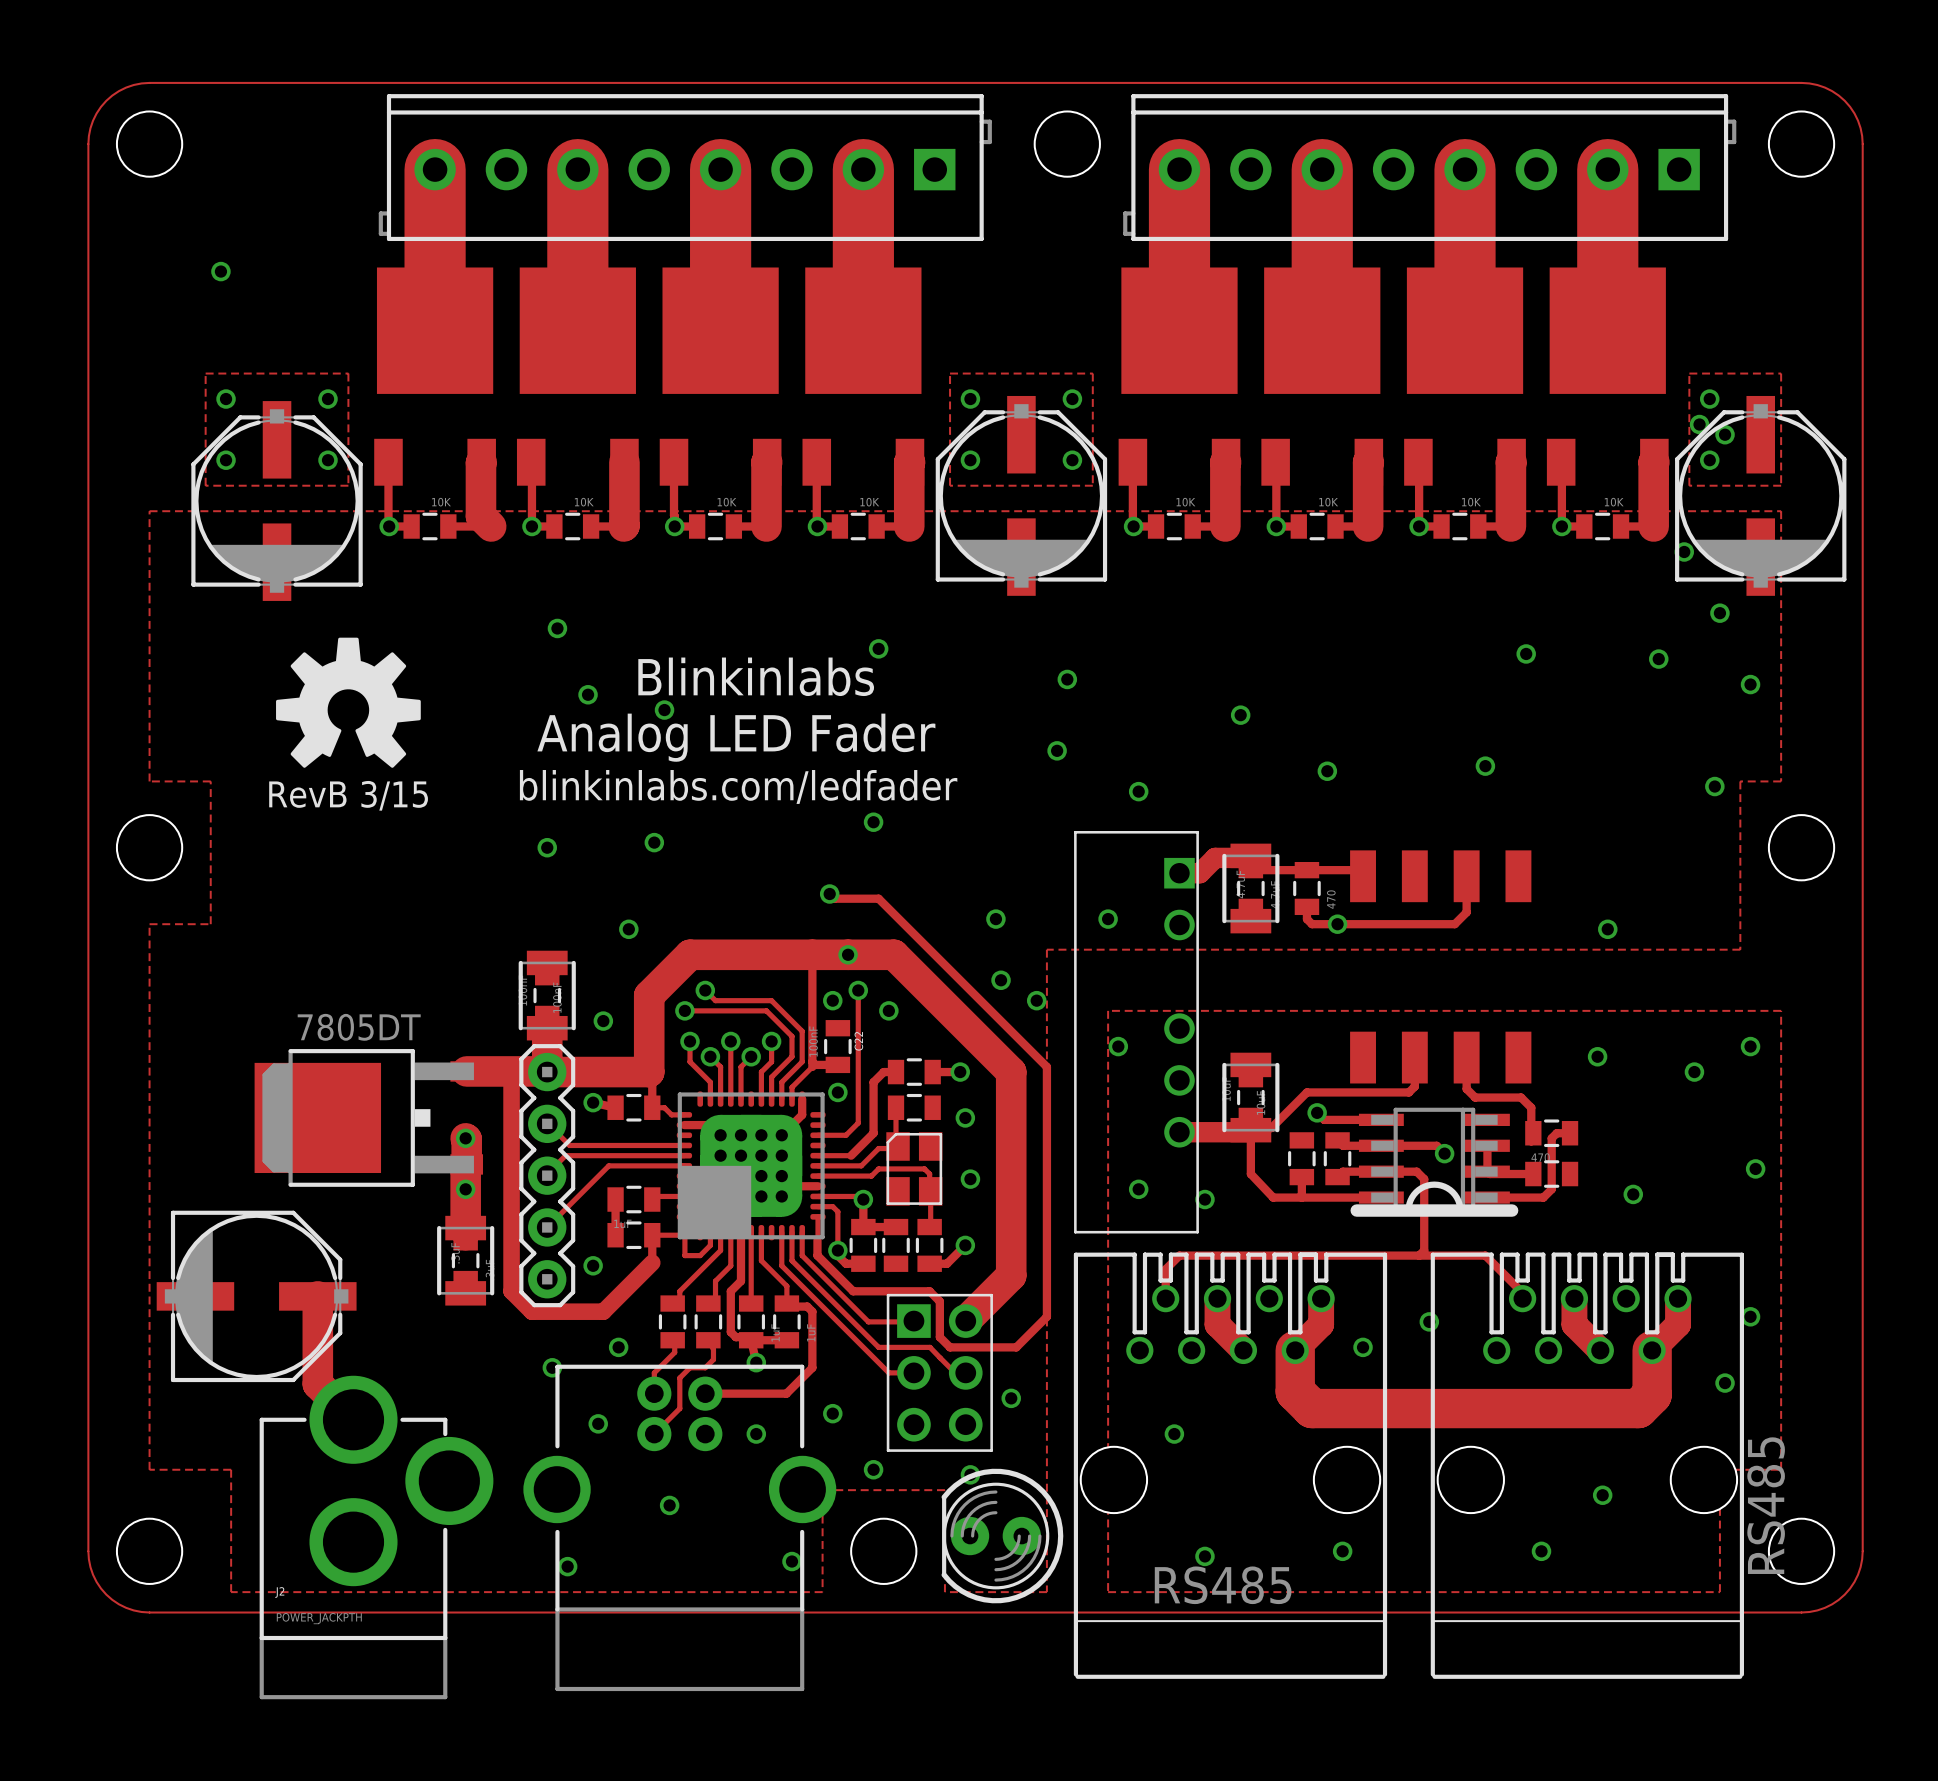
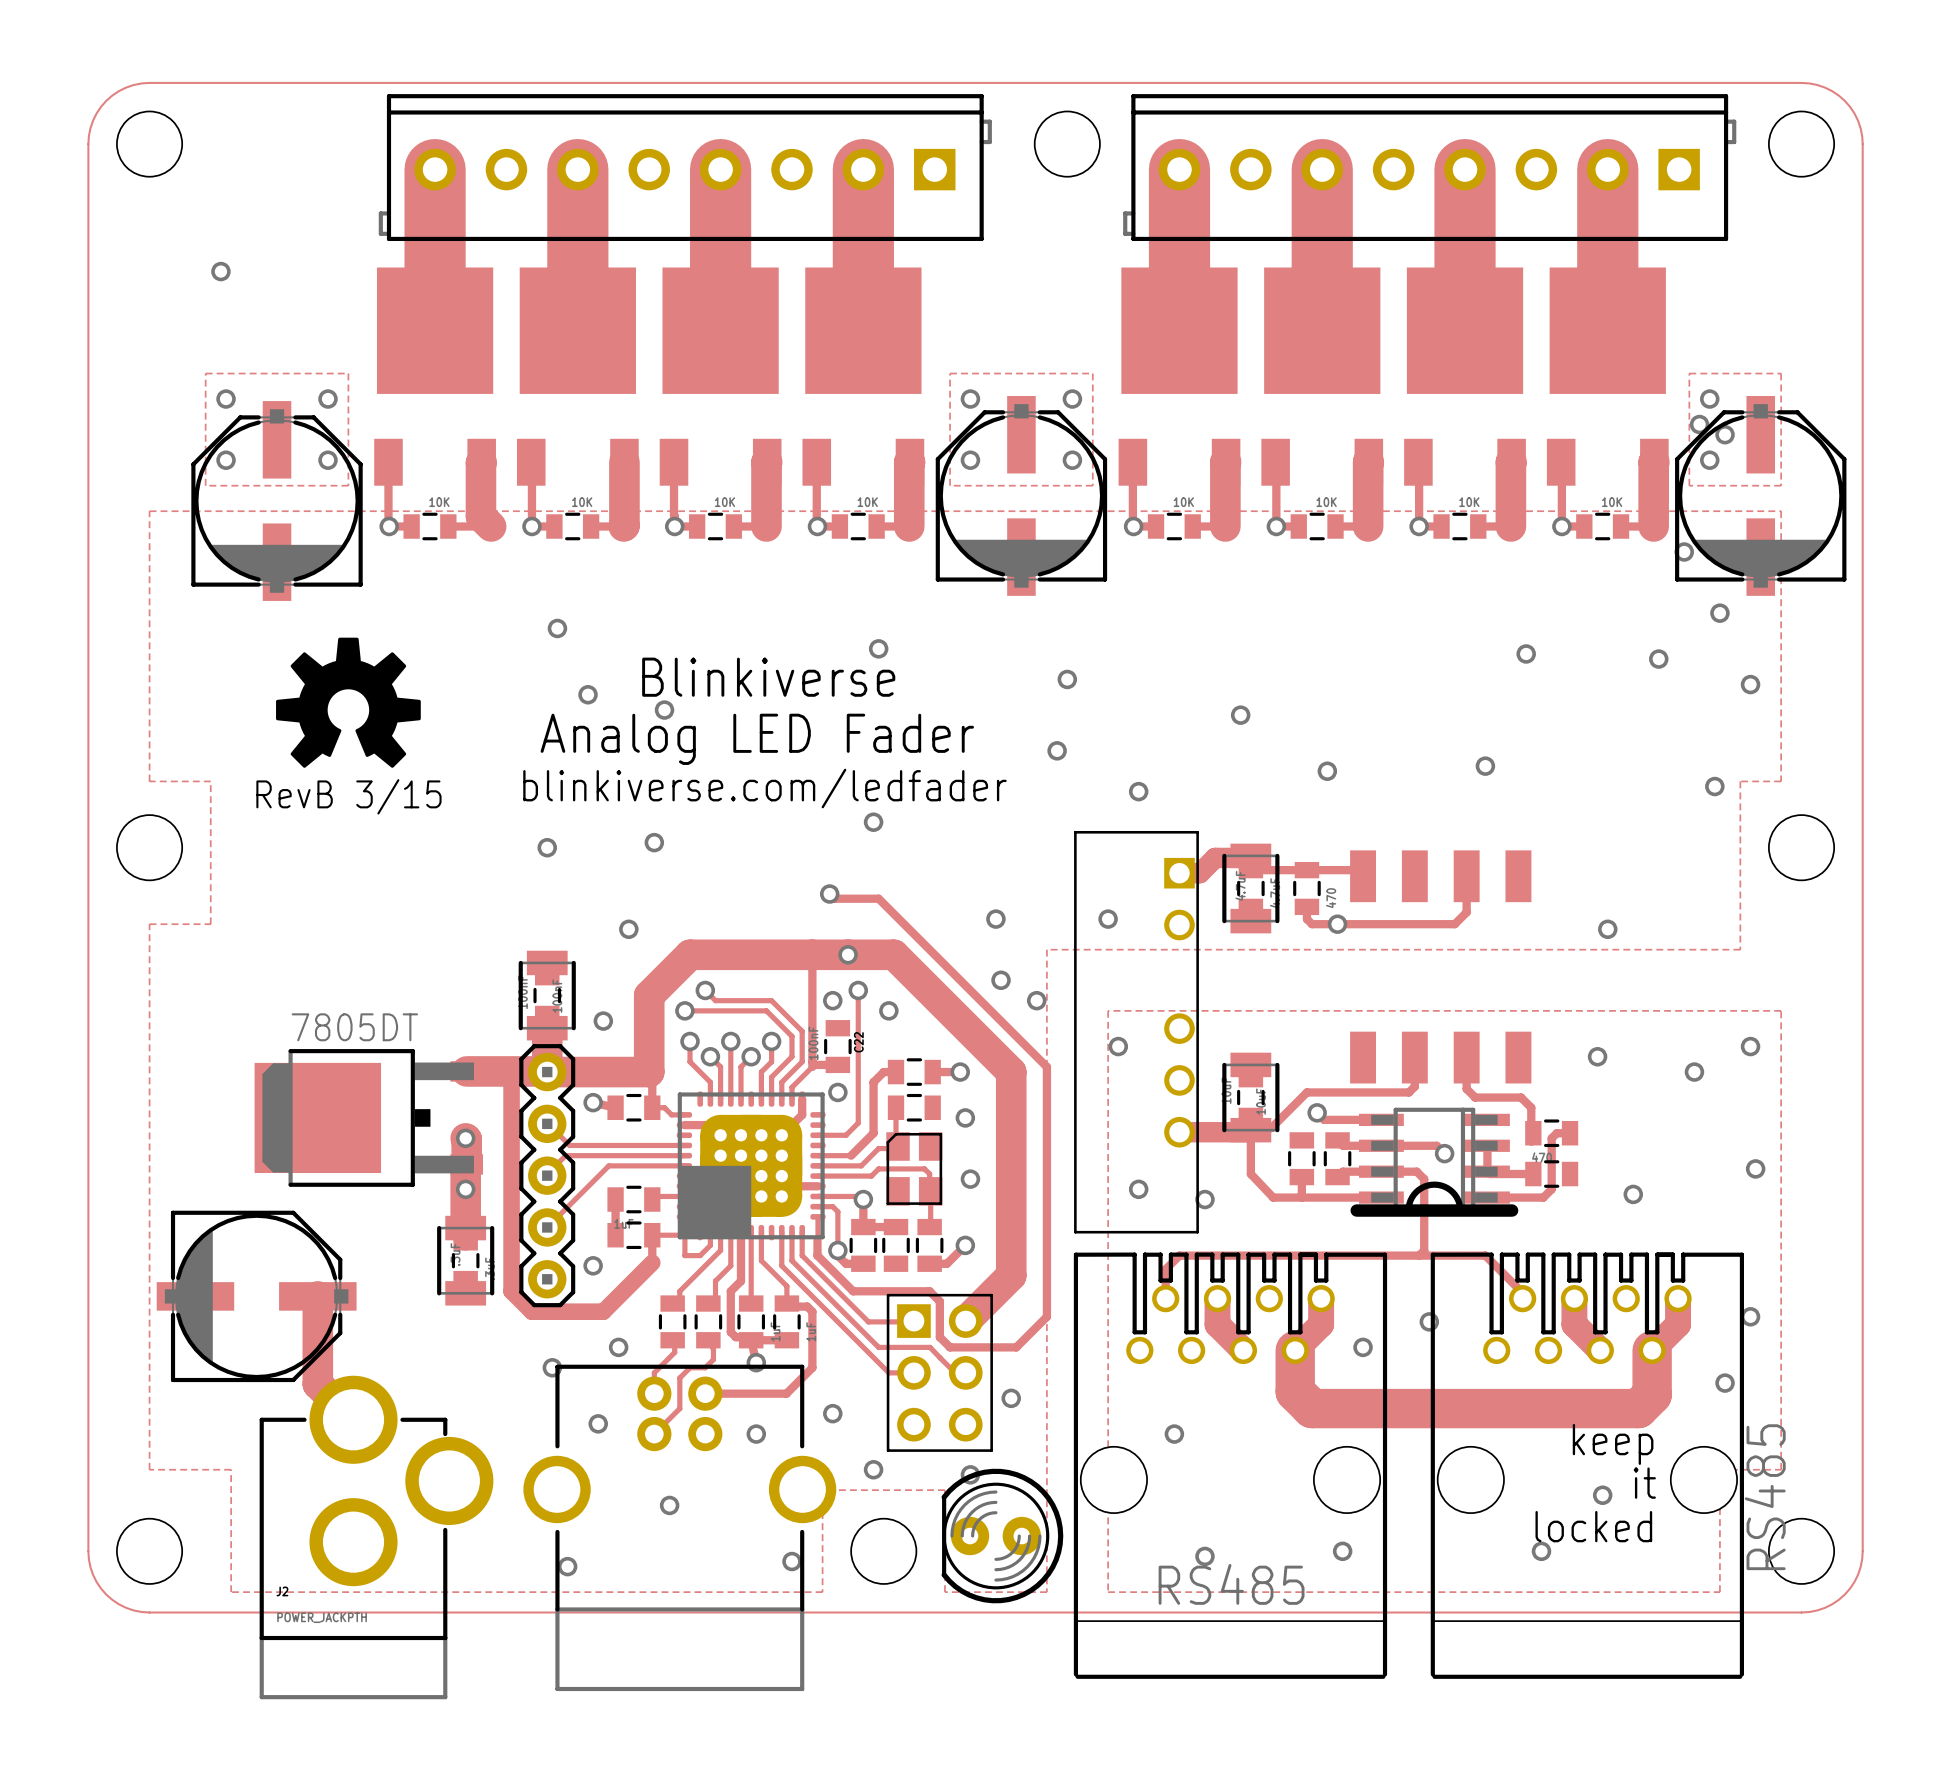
text: Blinkinlabs (756, 676) -> Blinkiverse (768, 677)
text: blinkinlabs.com/ledfader (738, 786) -> blinkiverse.com/ledfader (764, 788)
text: none -> keep (1613, 1444)
text: none -> it (1644, 1483)
text: none -> locked (1593, 1526)

